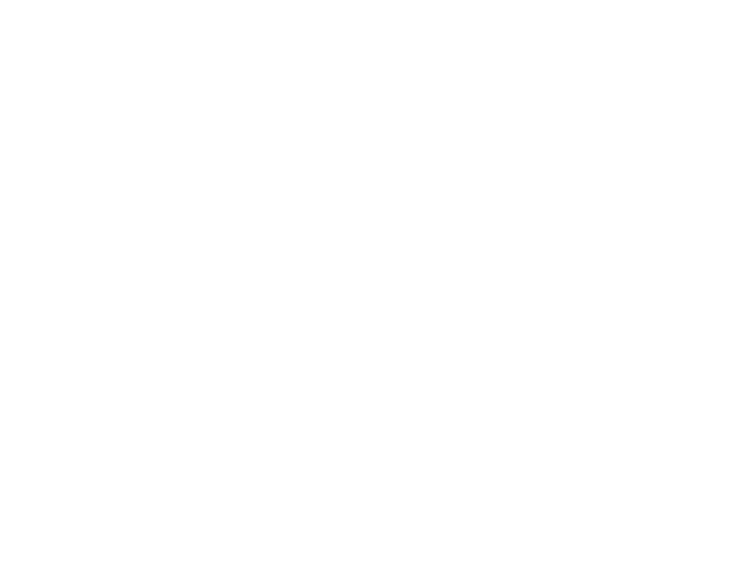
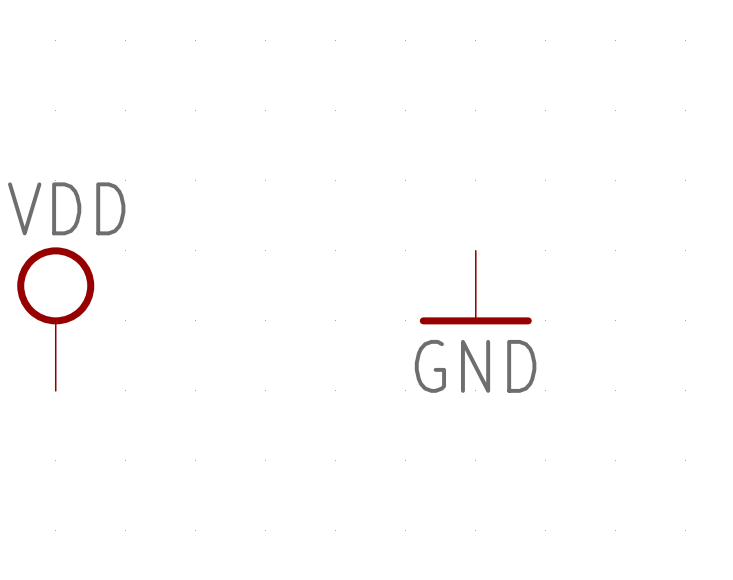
power symbol: none -> GND (475, 287)
power symbol: none -> VDD (55, 319)

